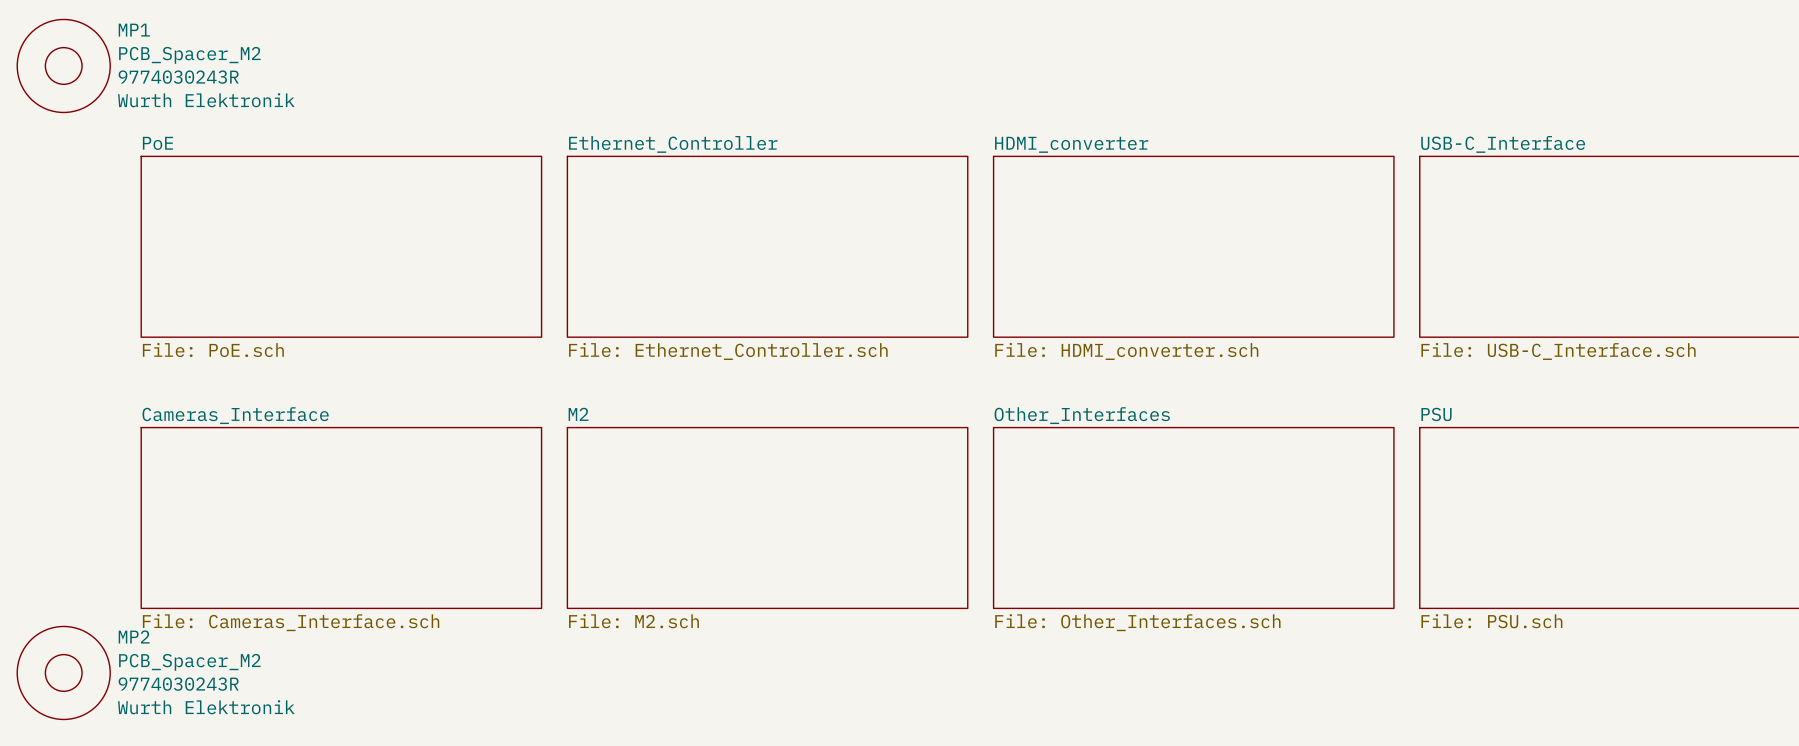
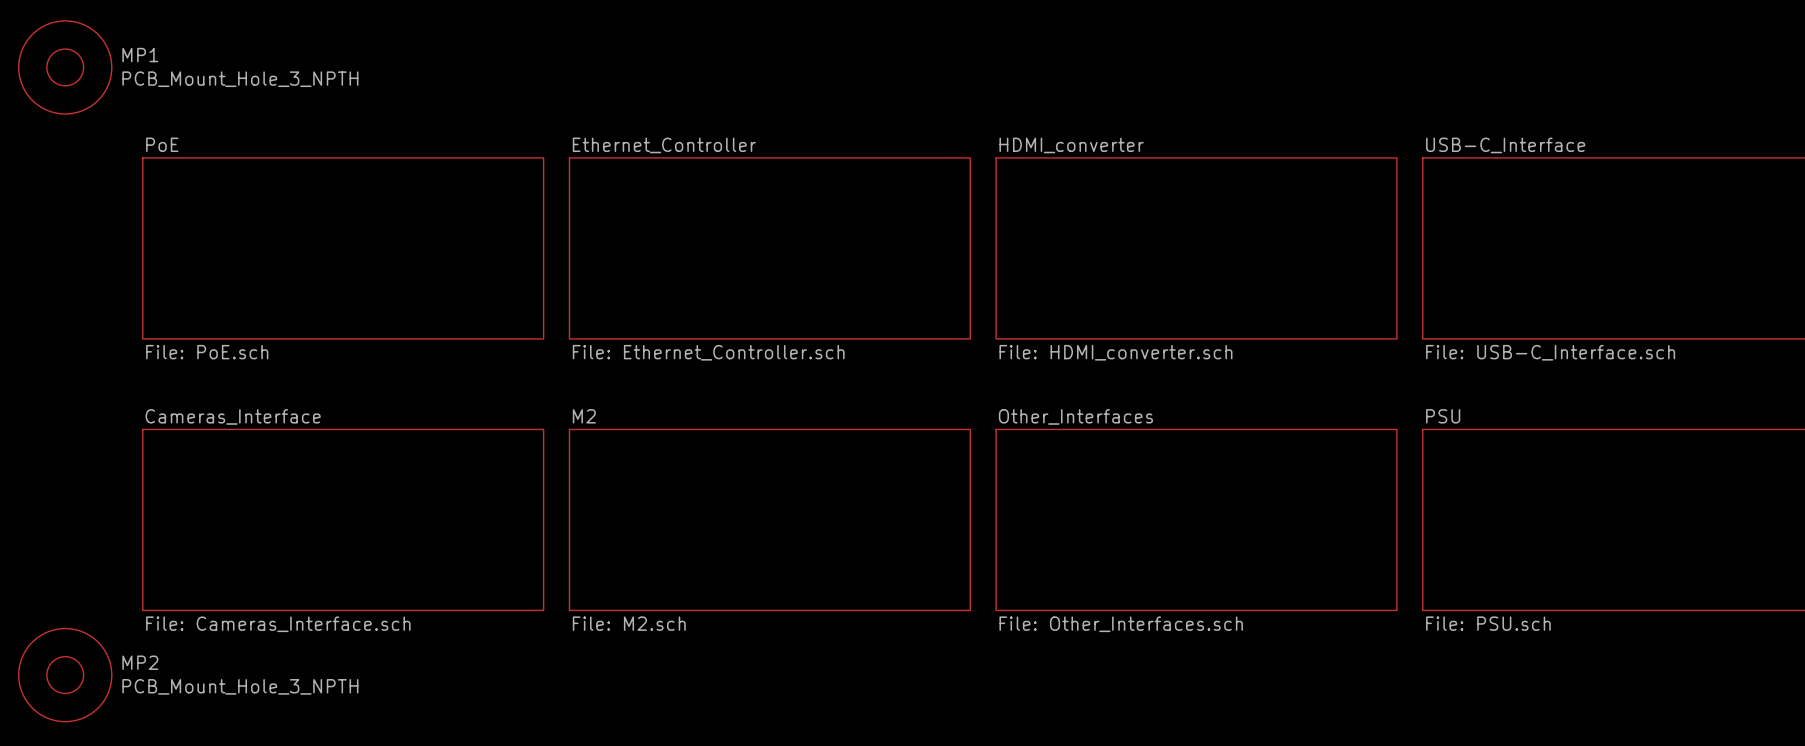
MP1 name position: MP1 (134, 30) -> MP1 (140, 55)
MP1 value: PCB_Spacer_M2 (189, 55) -> PCB_Mount_Hole_3_NPTH (240, 79)
MP1 text: 9774030243R (178, 77) -> none
MP1 text: Wurth Elektronik (206, 100) -> none
MP2 name position: MP2 (134, 636) -> MP2 (140, 662)
MP2 value: PCB_Spacer_M2 (189, 662) -> PCB_Mount_Hole_3_NPTH (240, 686)
MP2 text: 9774030243R (178, 684) -> none
MP2 text: Wurth Elektronik (206, 707) -> none

